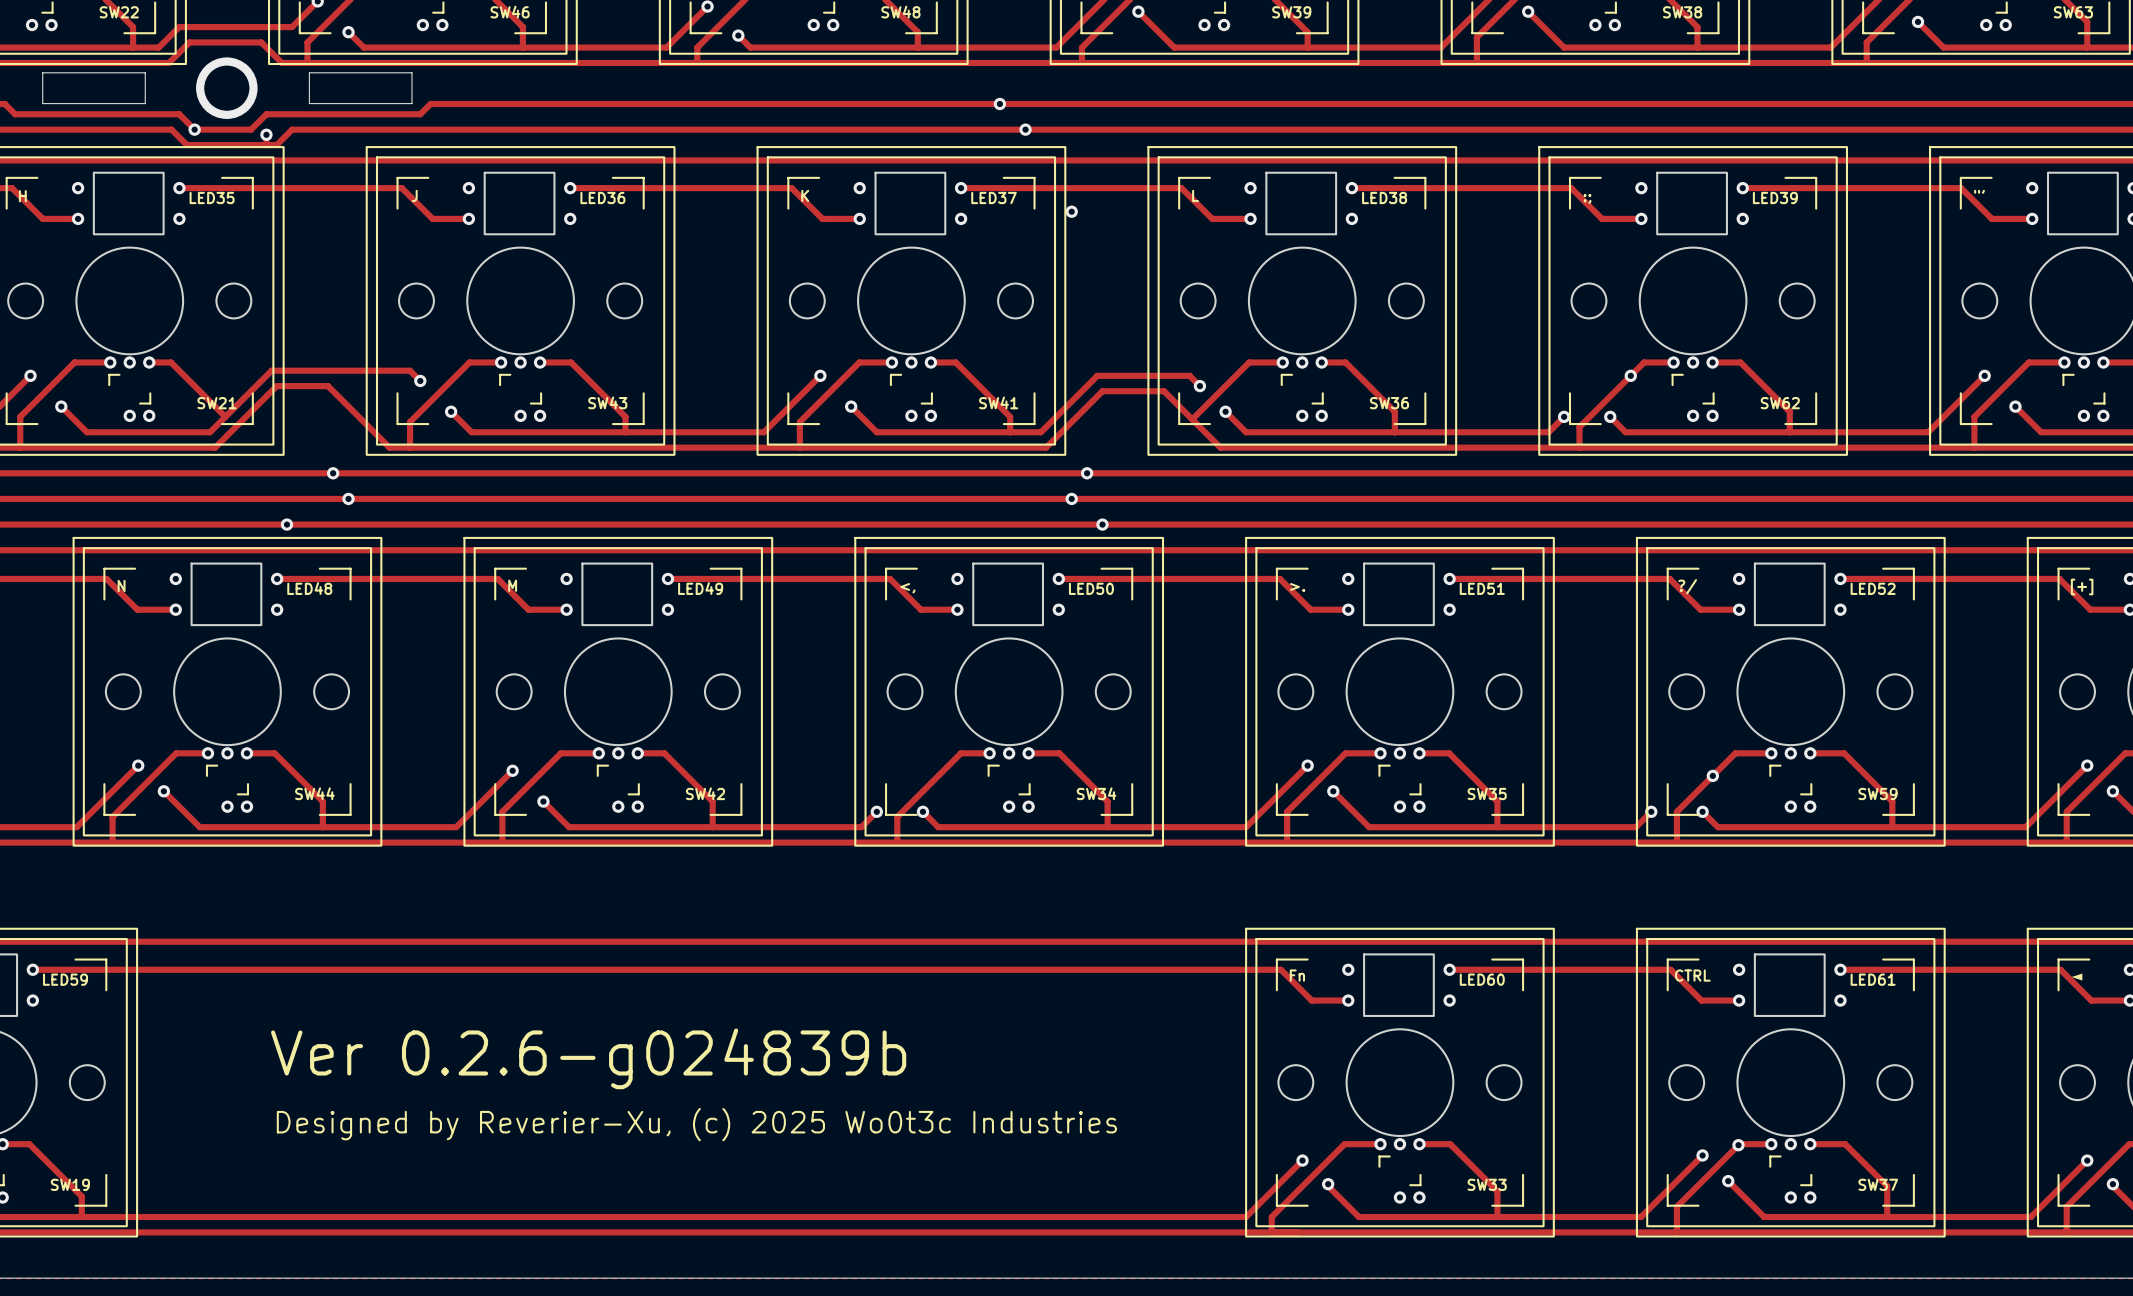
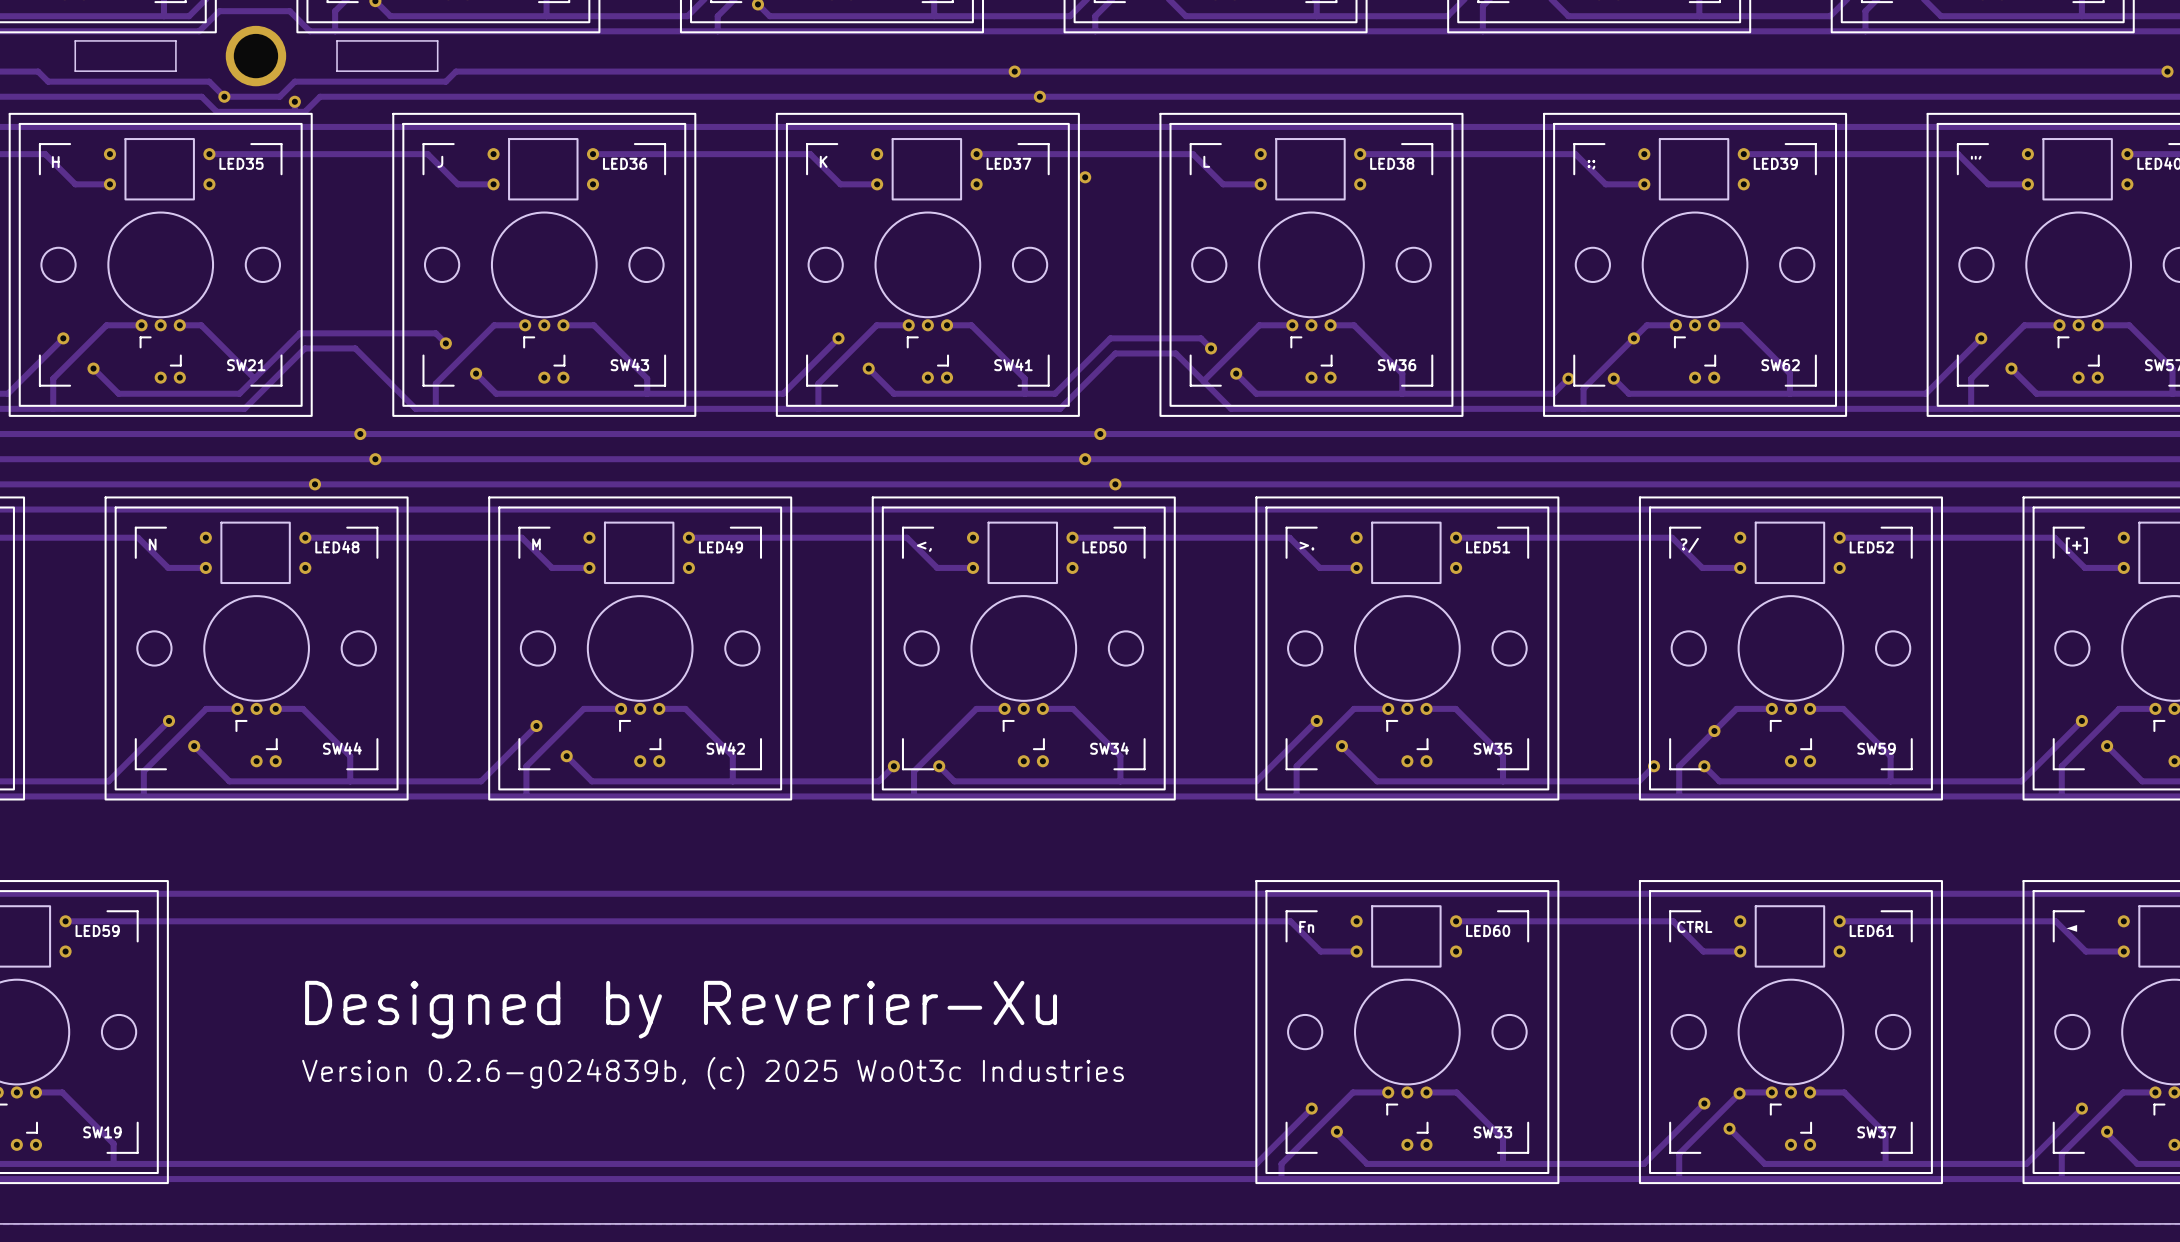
text: Ver 0.2.6-g024839b (588, 1058) -> Designed by Reverier-Xu (681, 1009)
text: Designed by Reverier-Xu, (c) 2025 Wo0t3c Industries (696, 1124) -> Version 0.2.6-g024839b, (c) 2025 Wo0t3c Industries (713, 1073)

